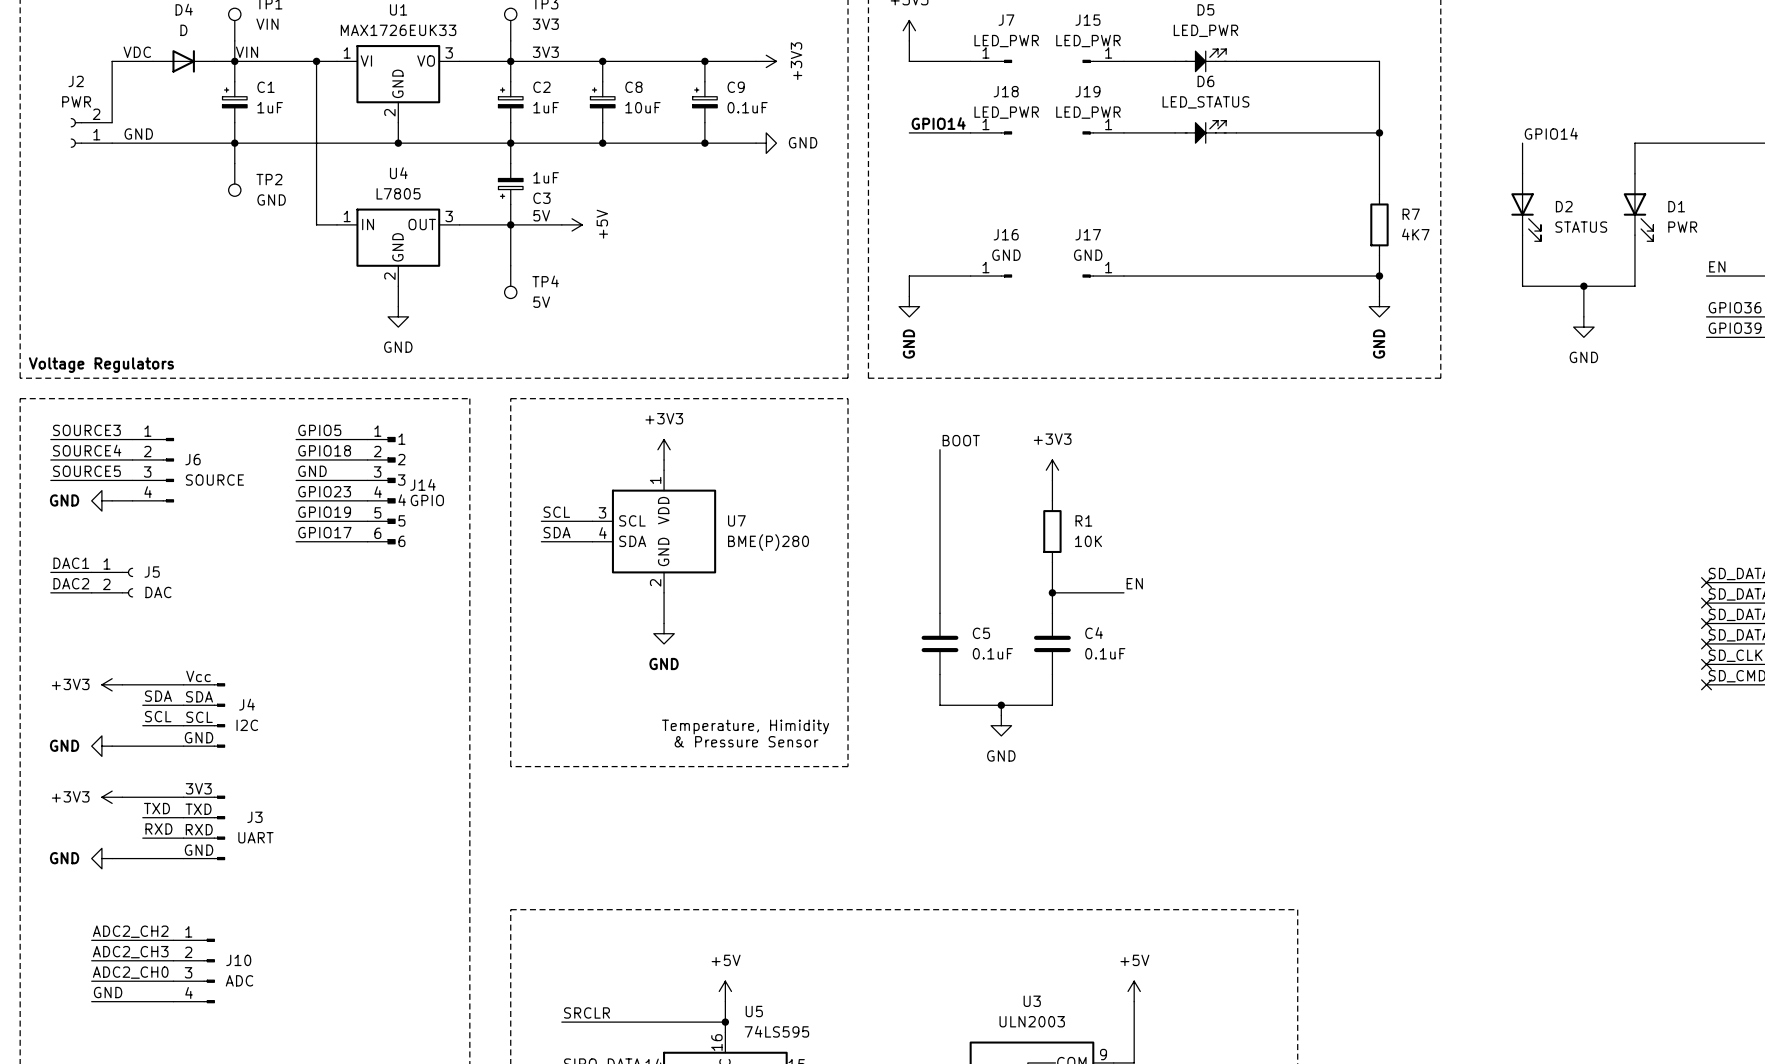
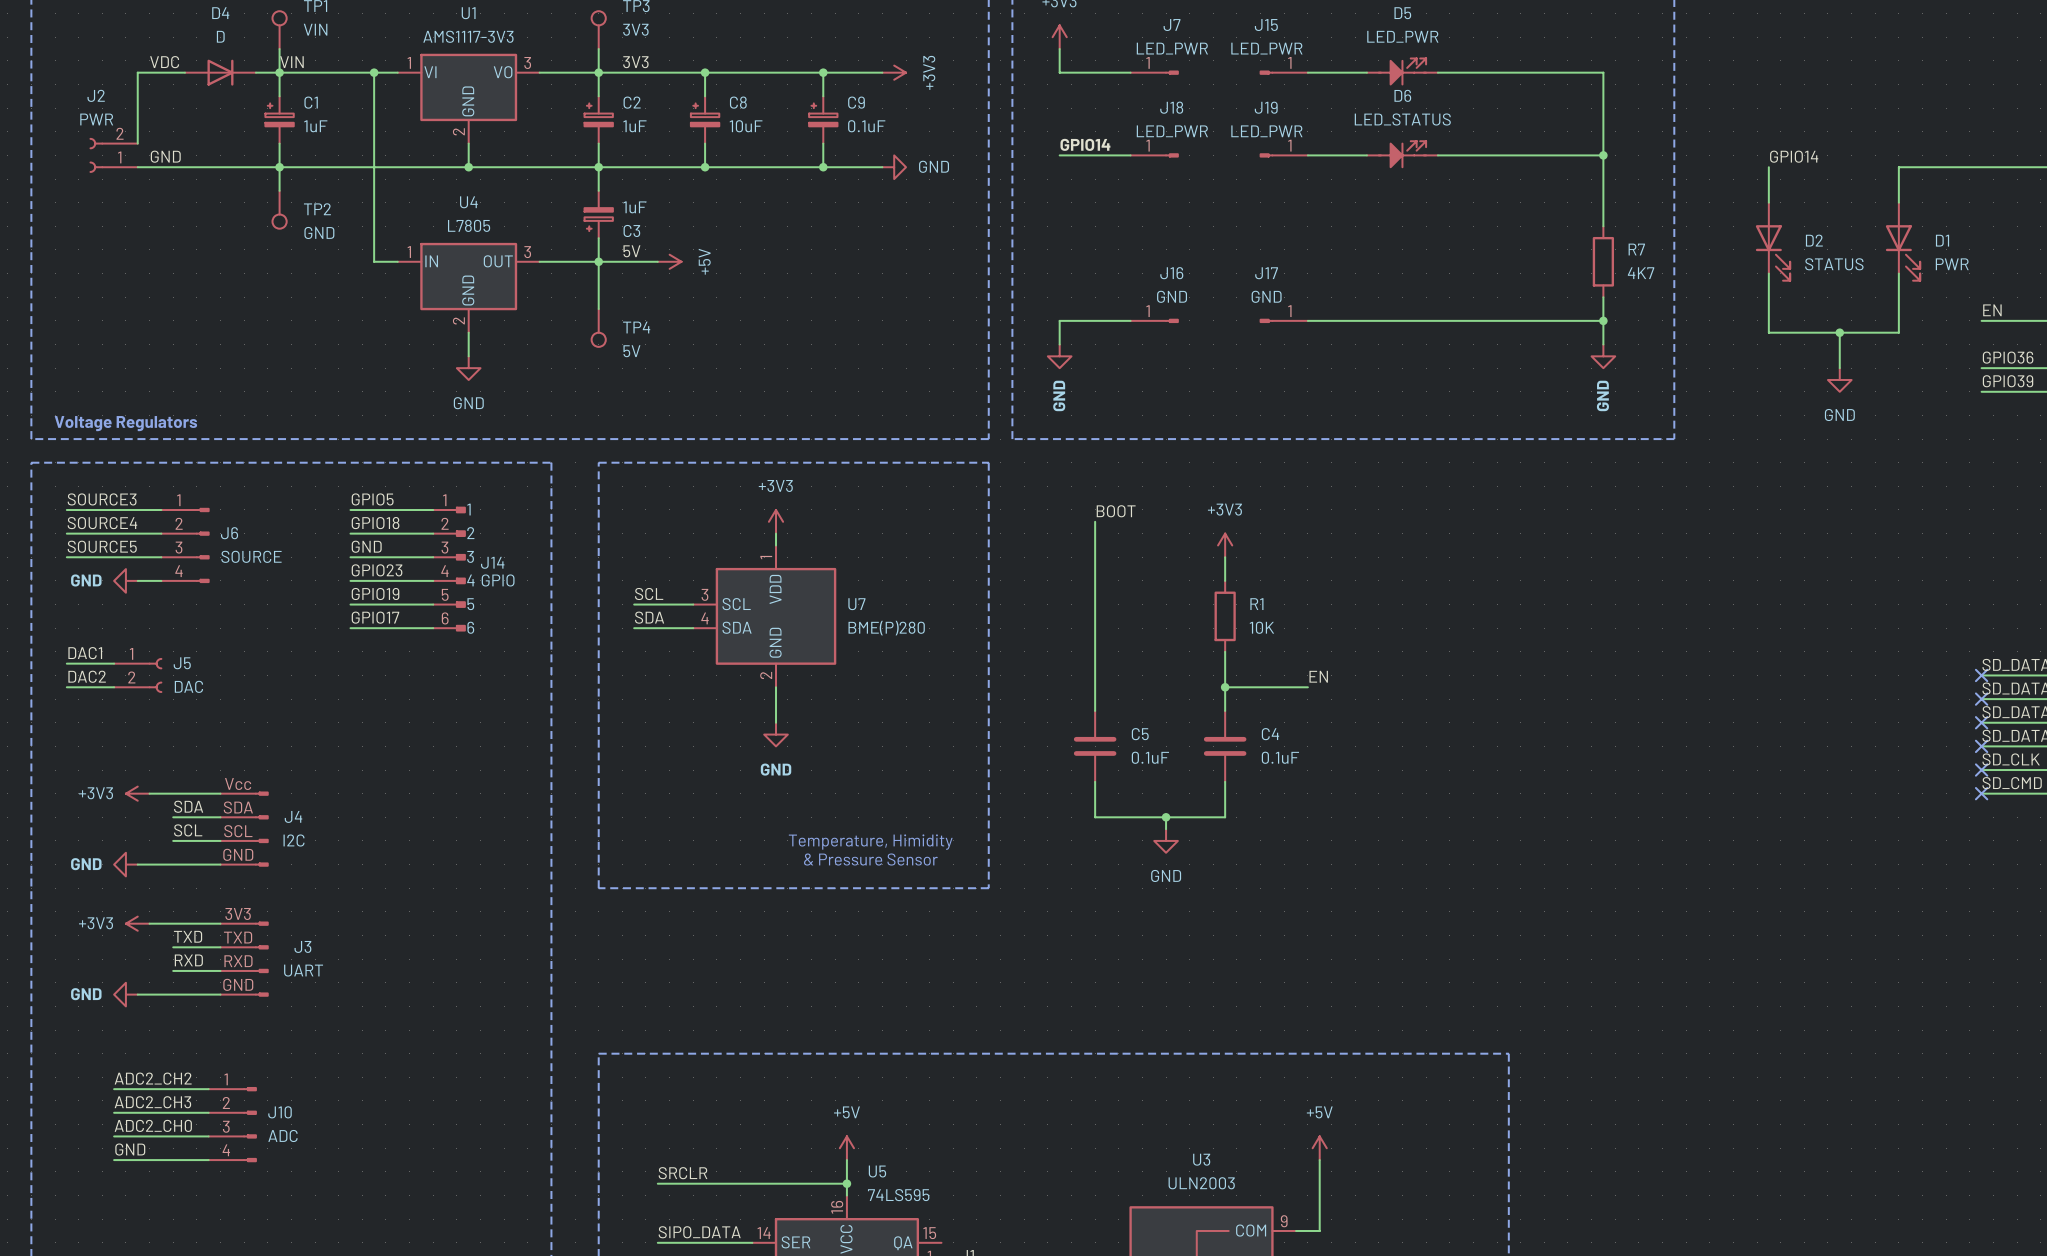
U1 value: MAX1726EUK33 (398, 30) -> AMS1117-3V3 (468, 36)

